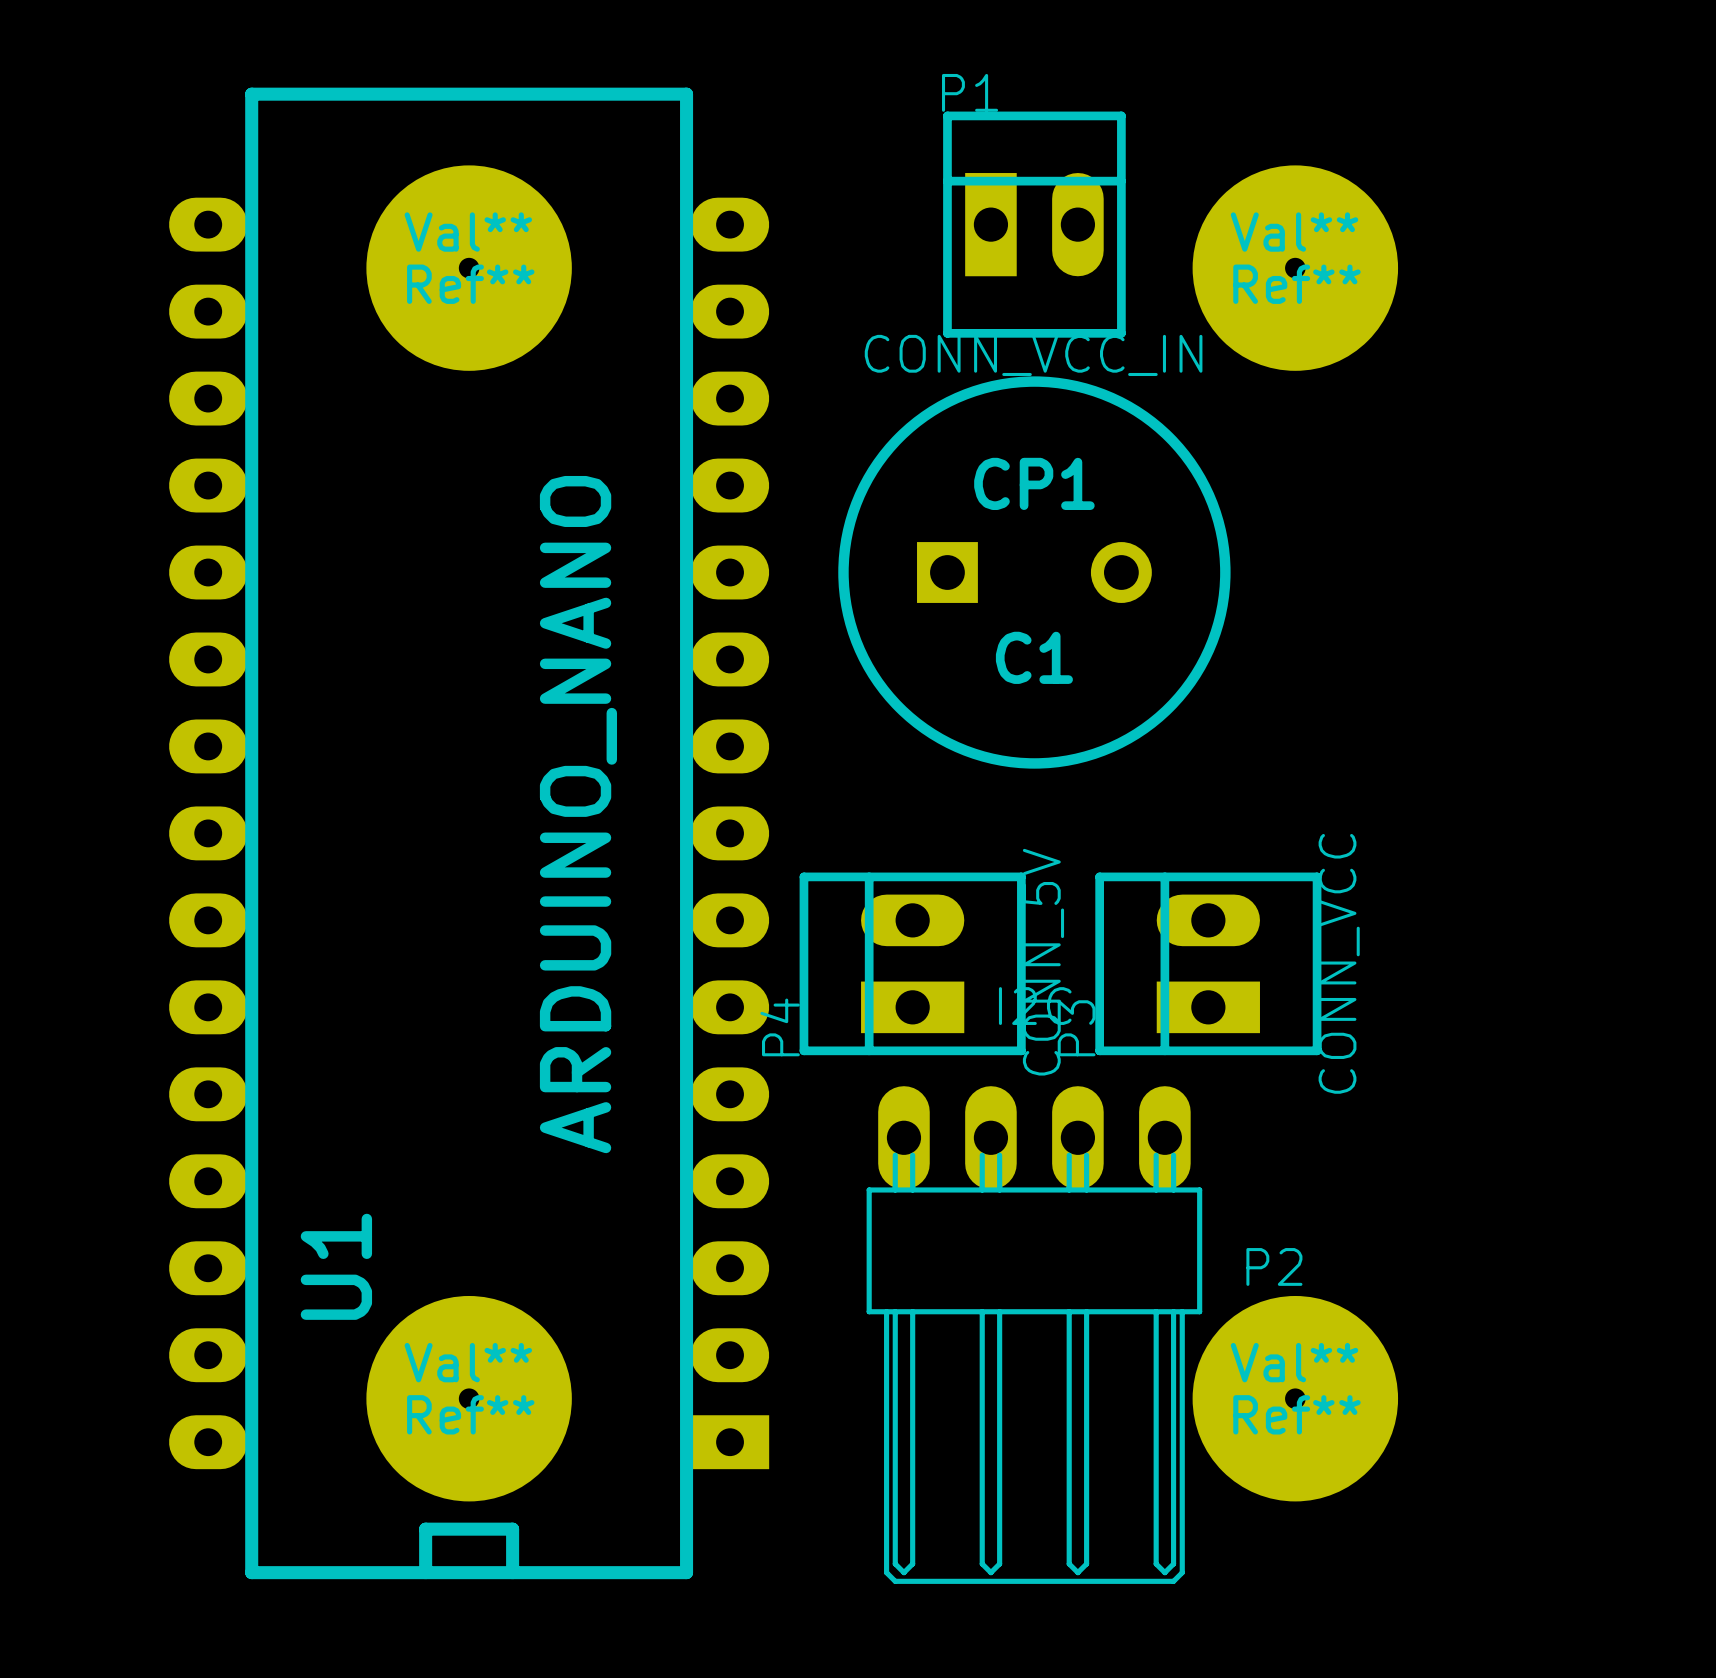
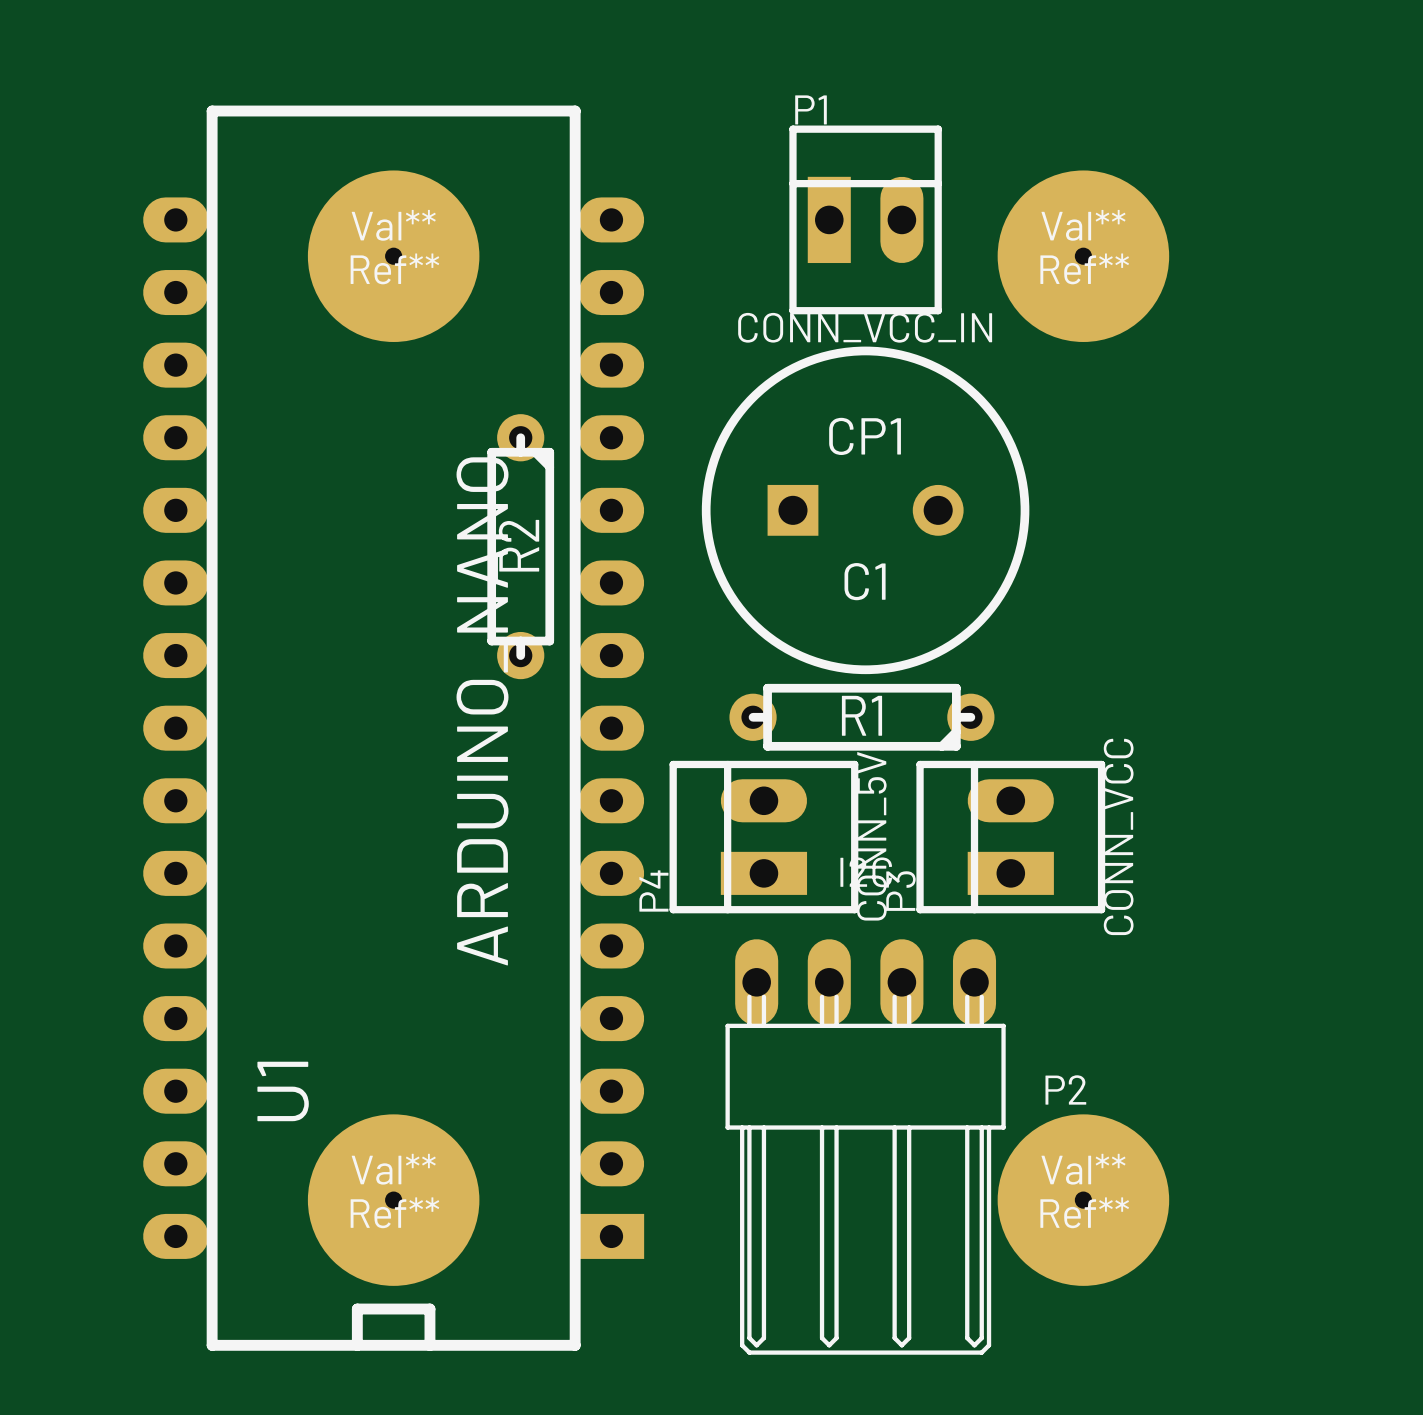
R2: none -> (520, 546)
R1: none -> (861, 717)

